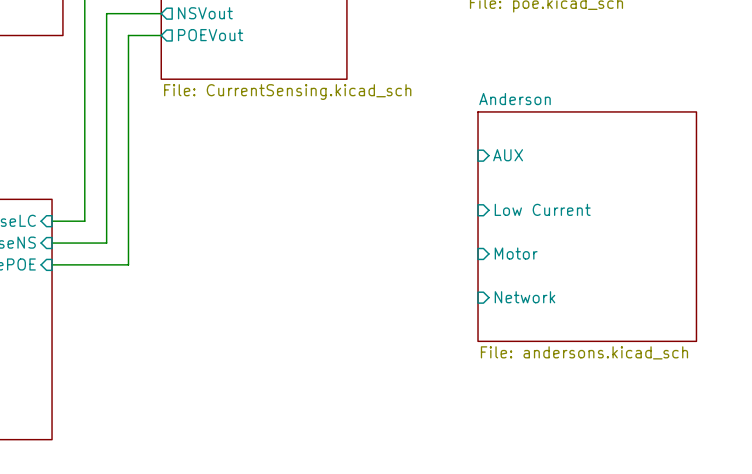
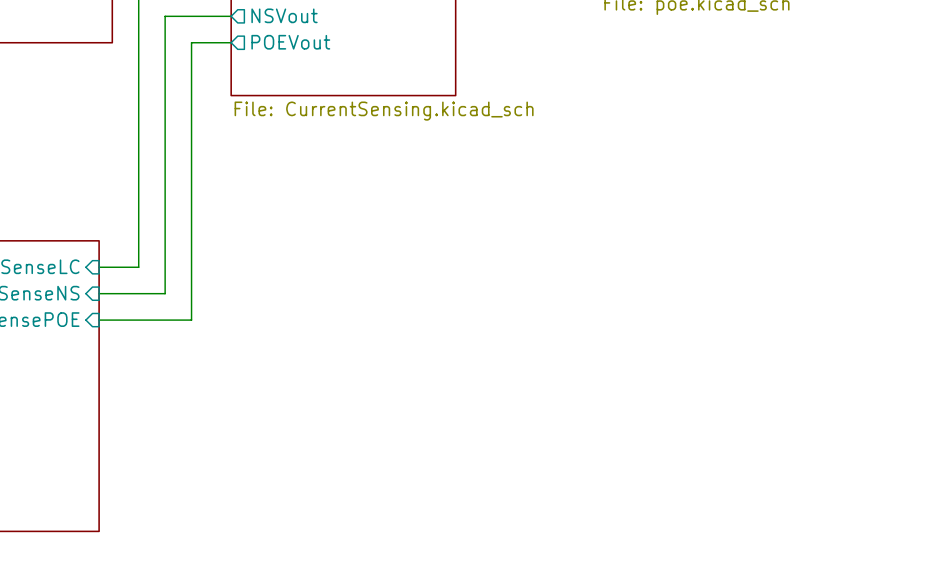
sheet pin: AUX (508, 155) -> none
sheet pin: Low Current (542, 209) -> none
sheet Anderson: File: andersons.kicad_sch (587, 226) -> none
sheet pin: Motor (516, 253) -> none
sheet pin: Network (524, 297) -> none

